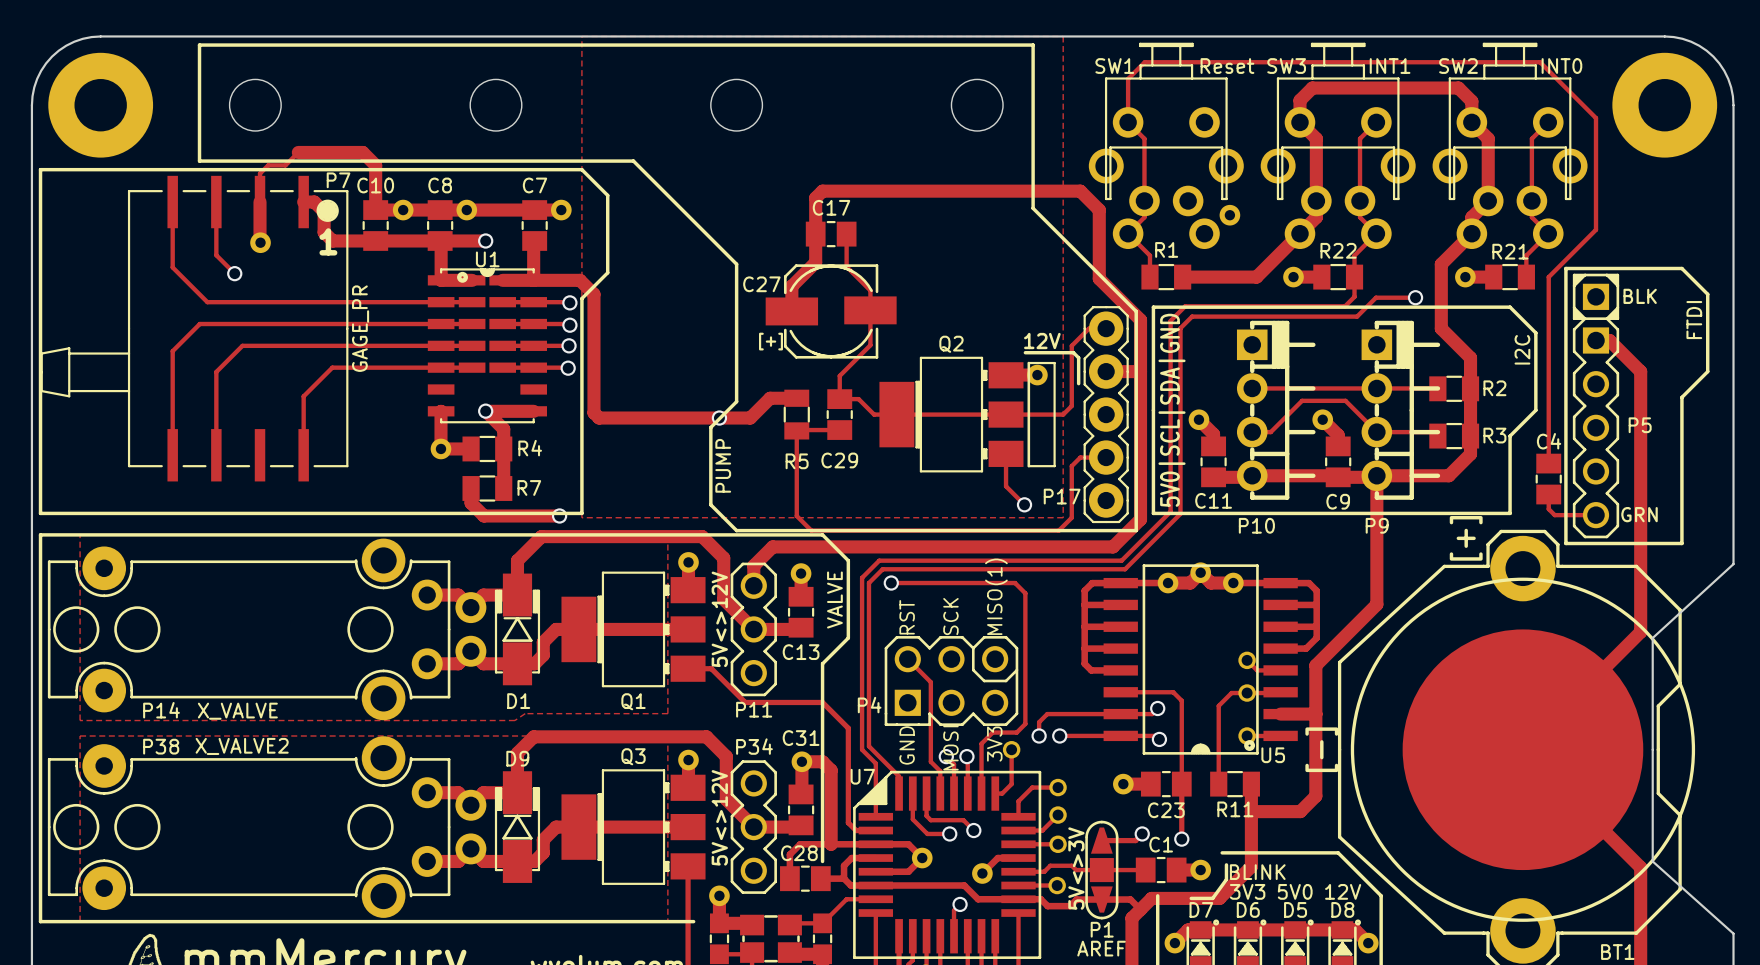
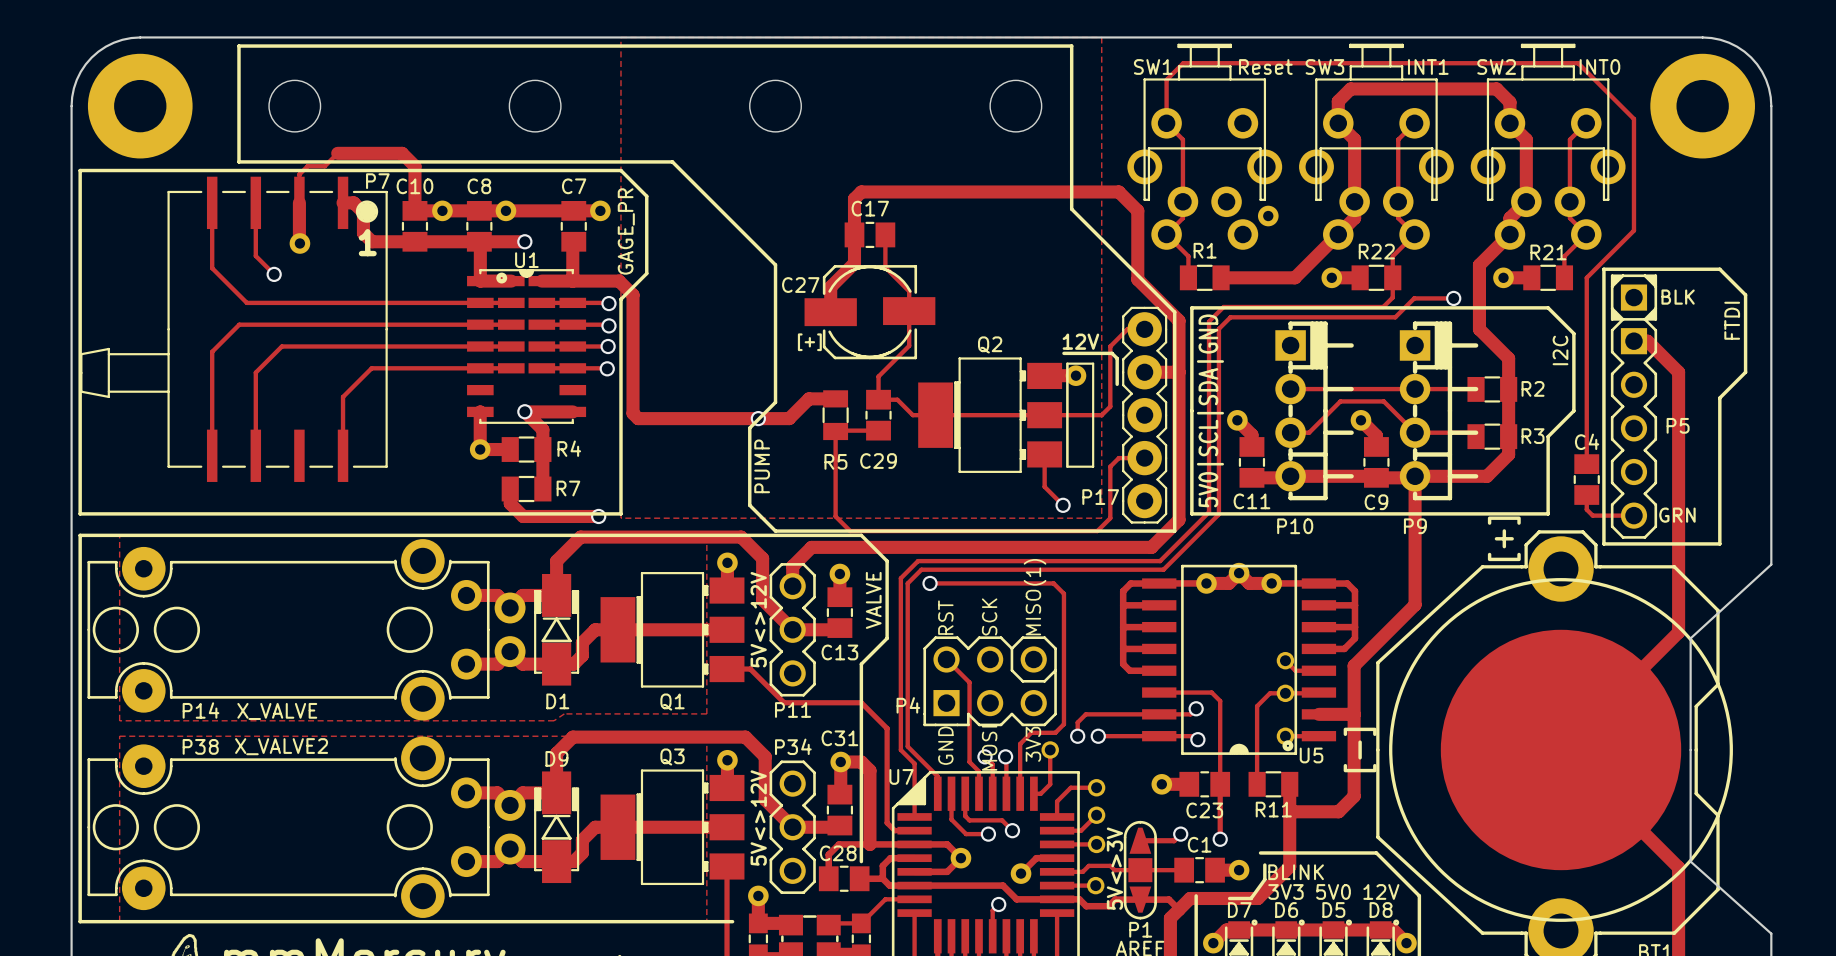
P7 value position: GAGE_PR (360, 328) -> GAGE_PR (626, 231)

